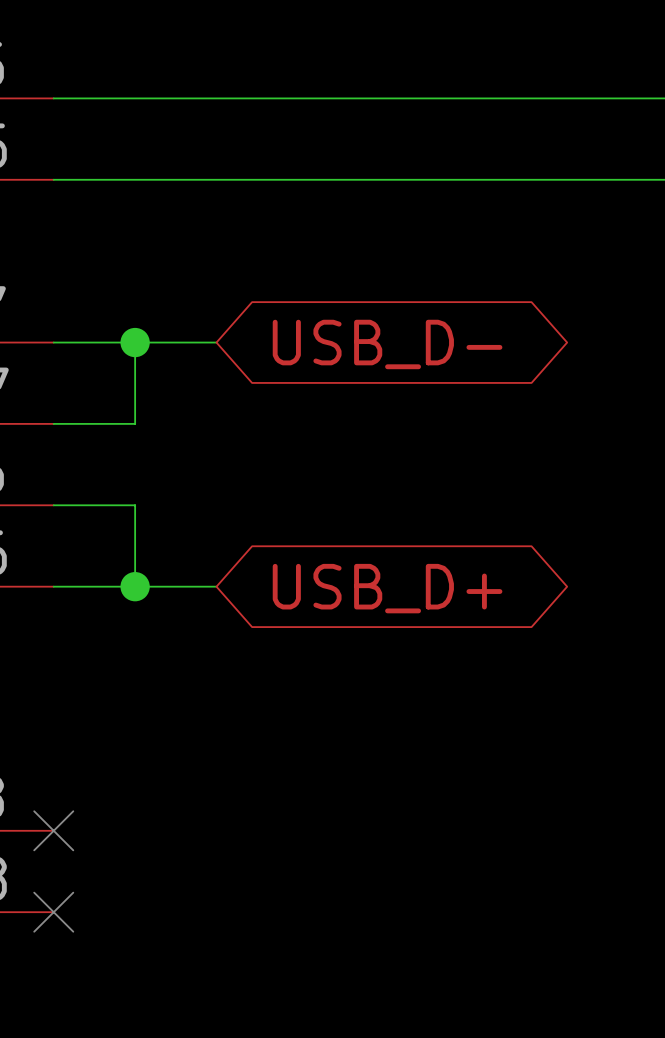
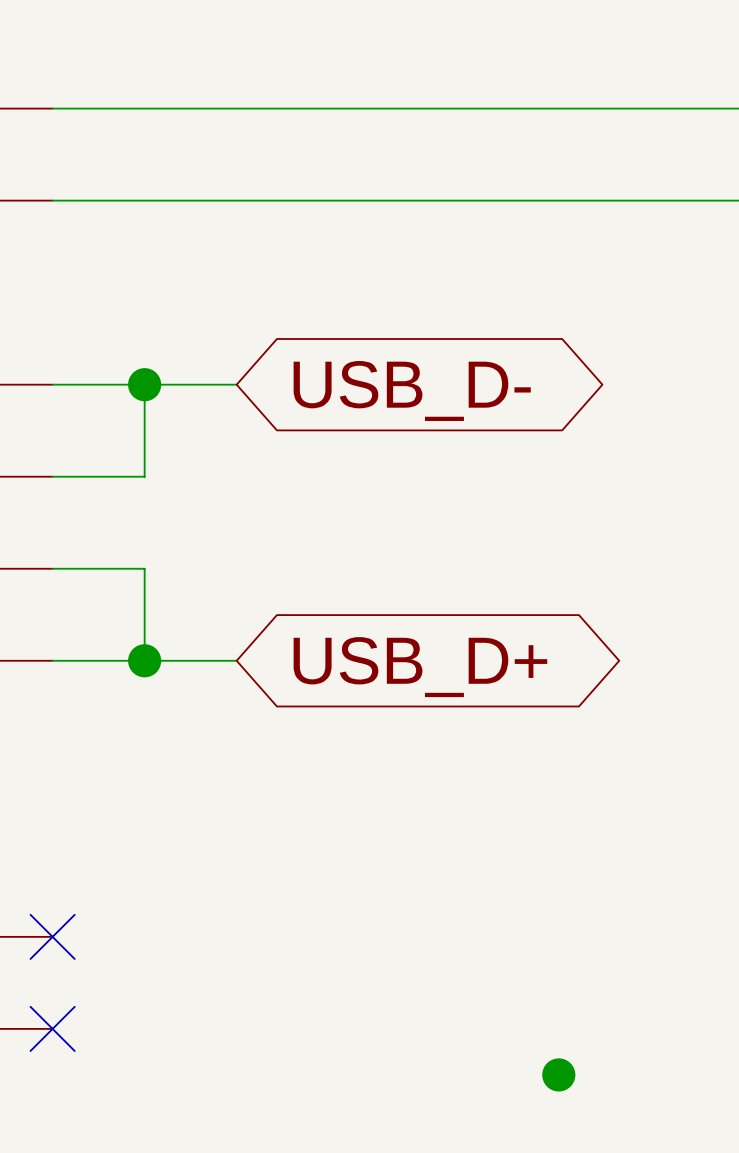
junction: none -> (558, 1074)

